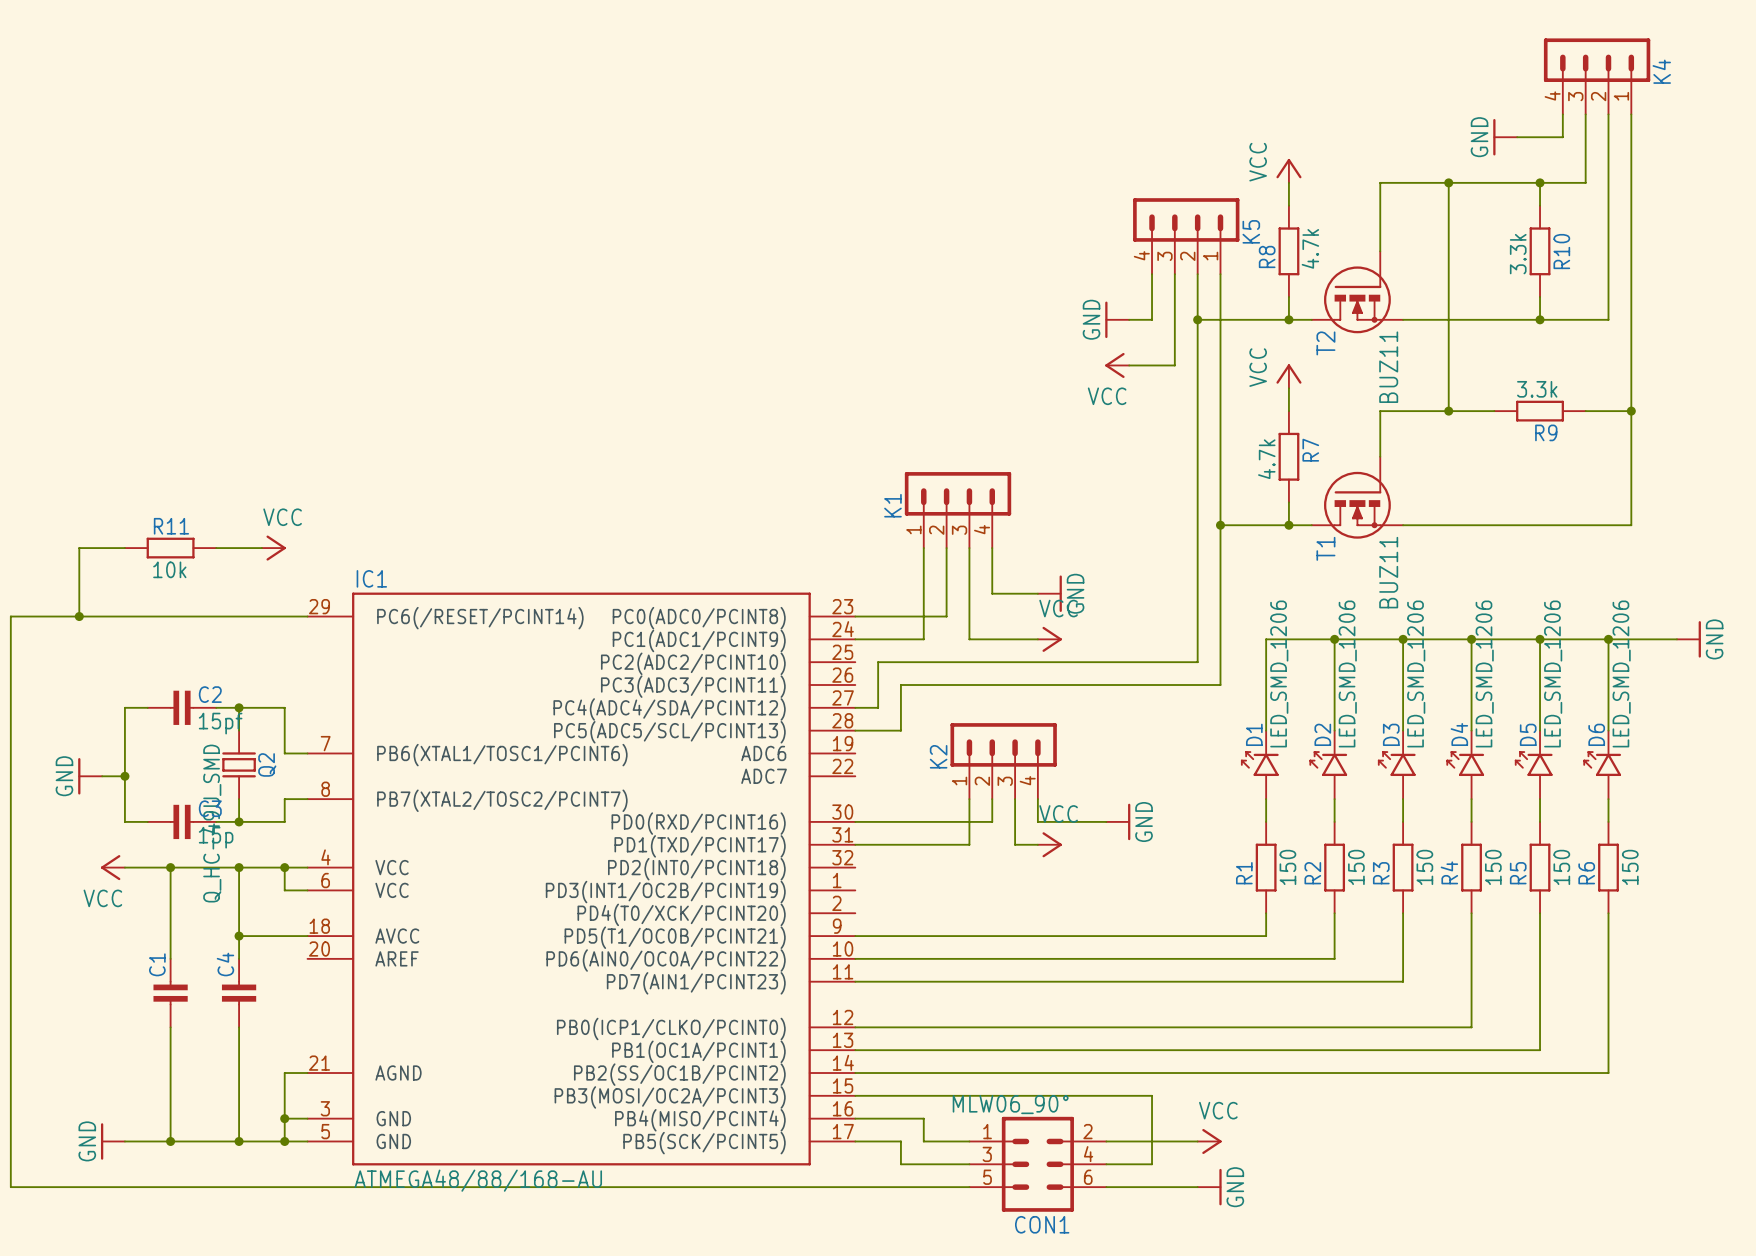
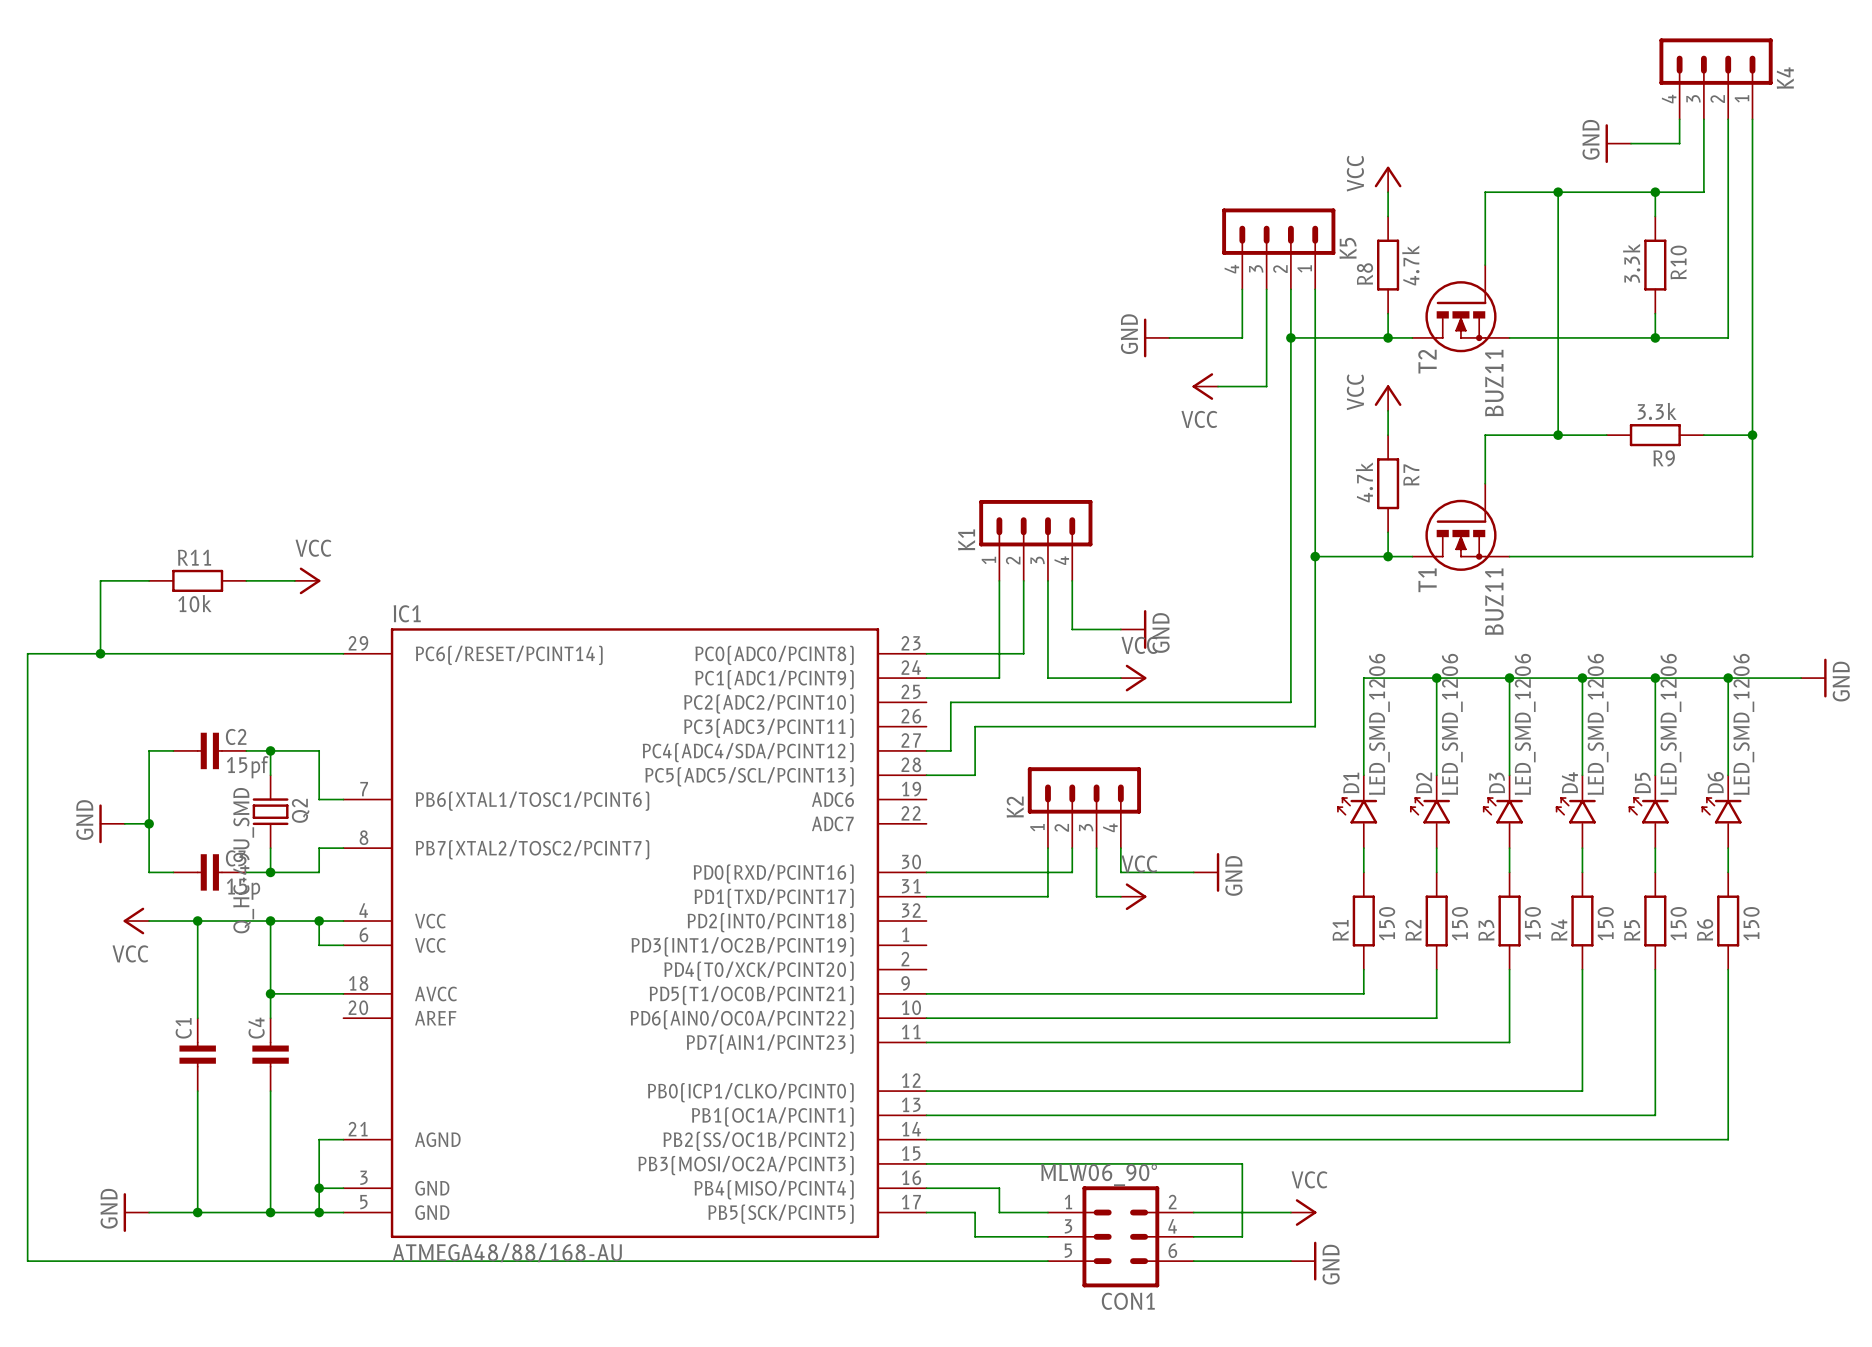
power symbol position: GND (1117, 319) -> GND (1156, 337)

